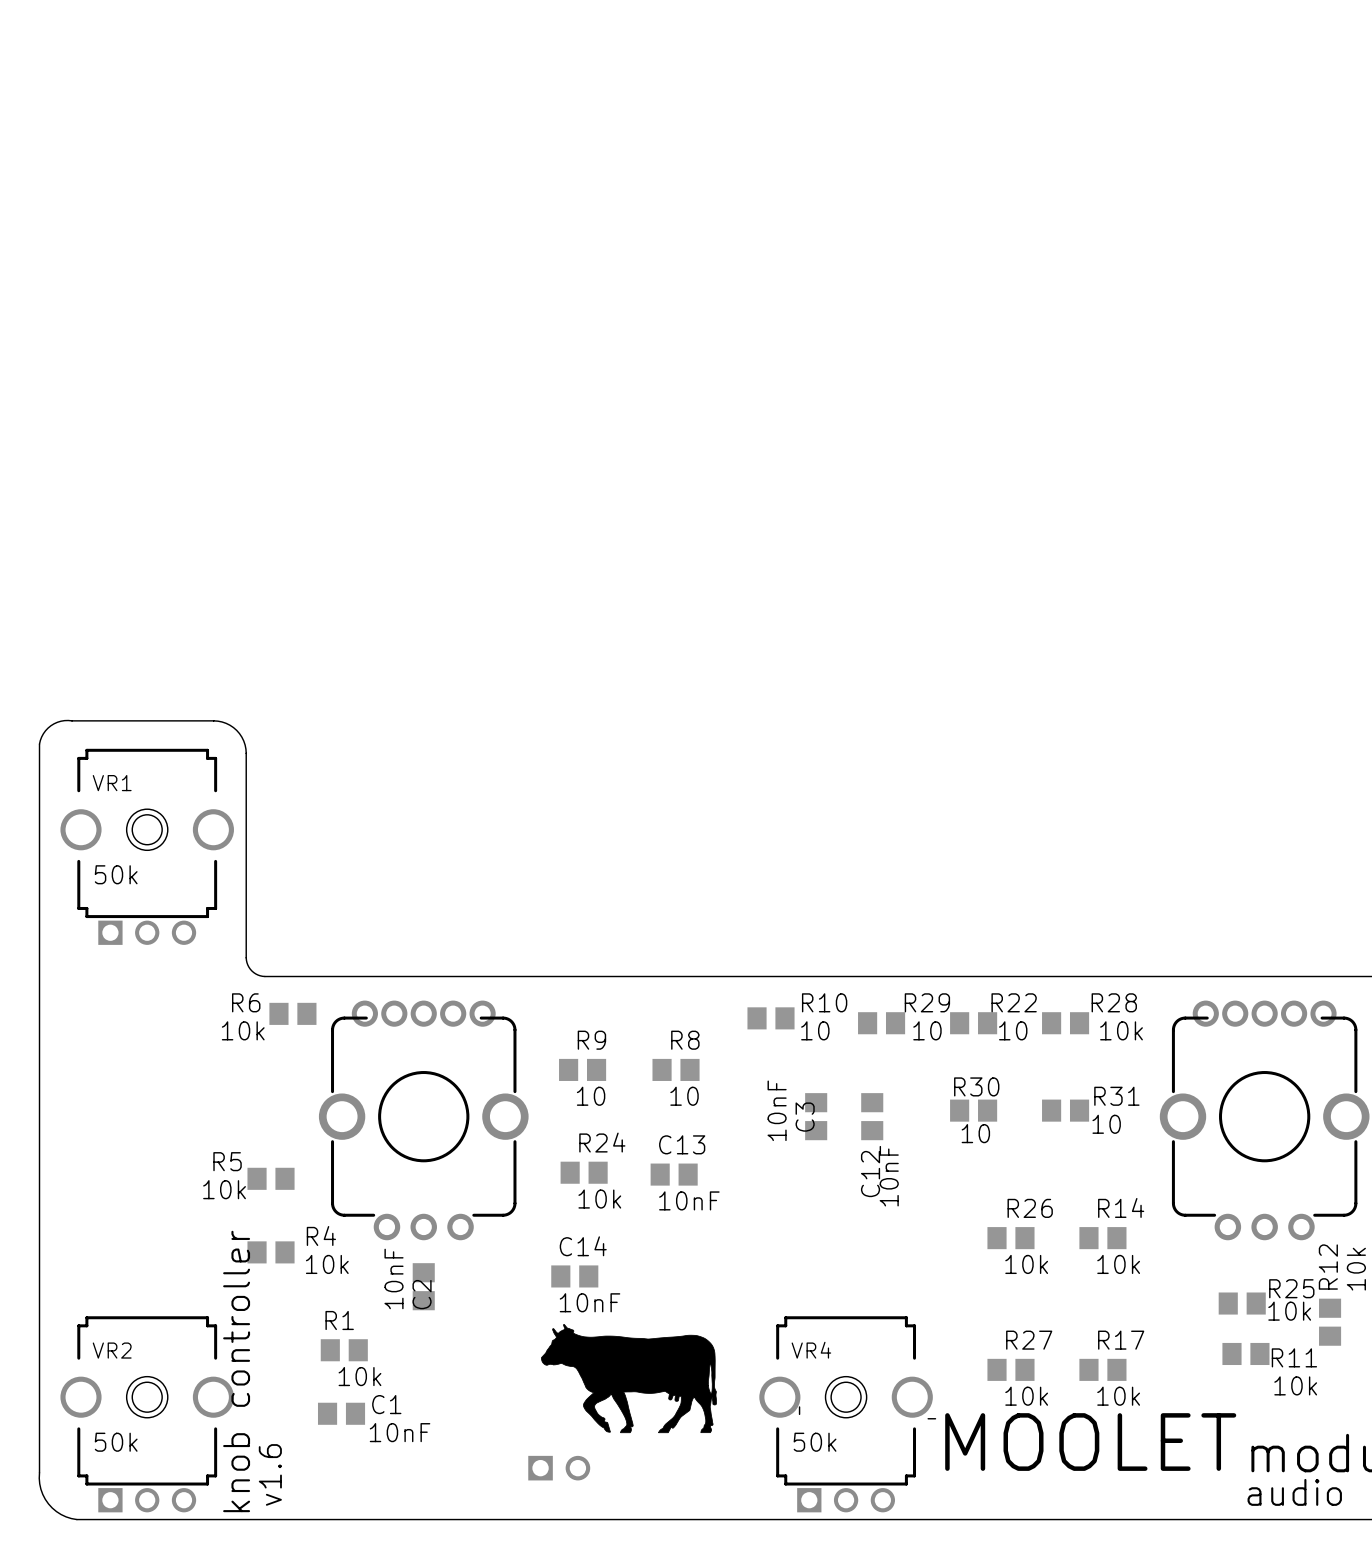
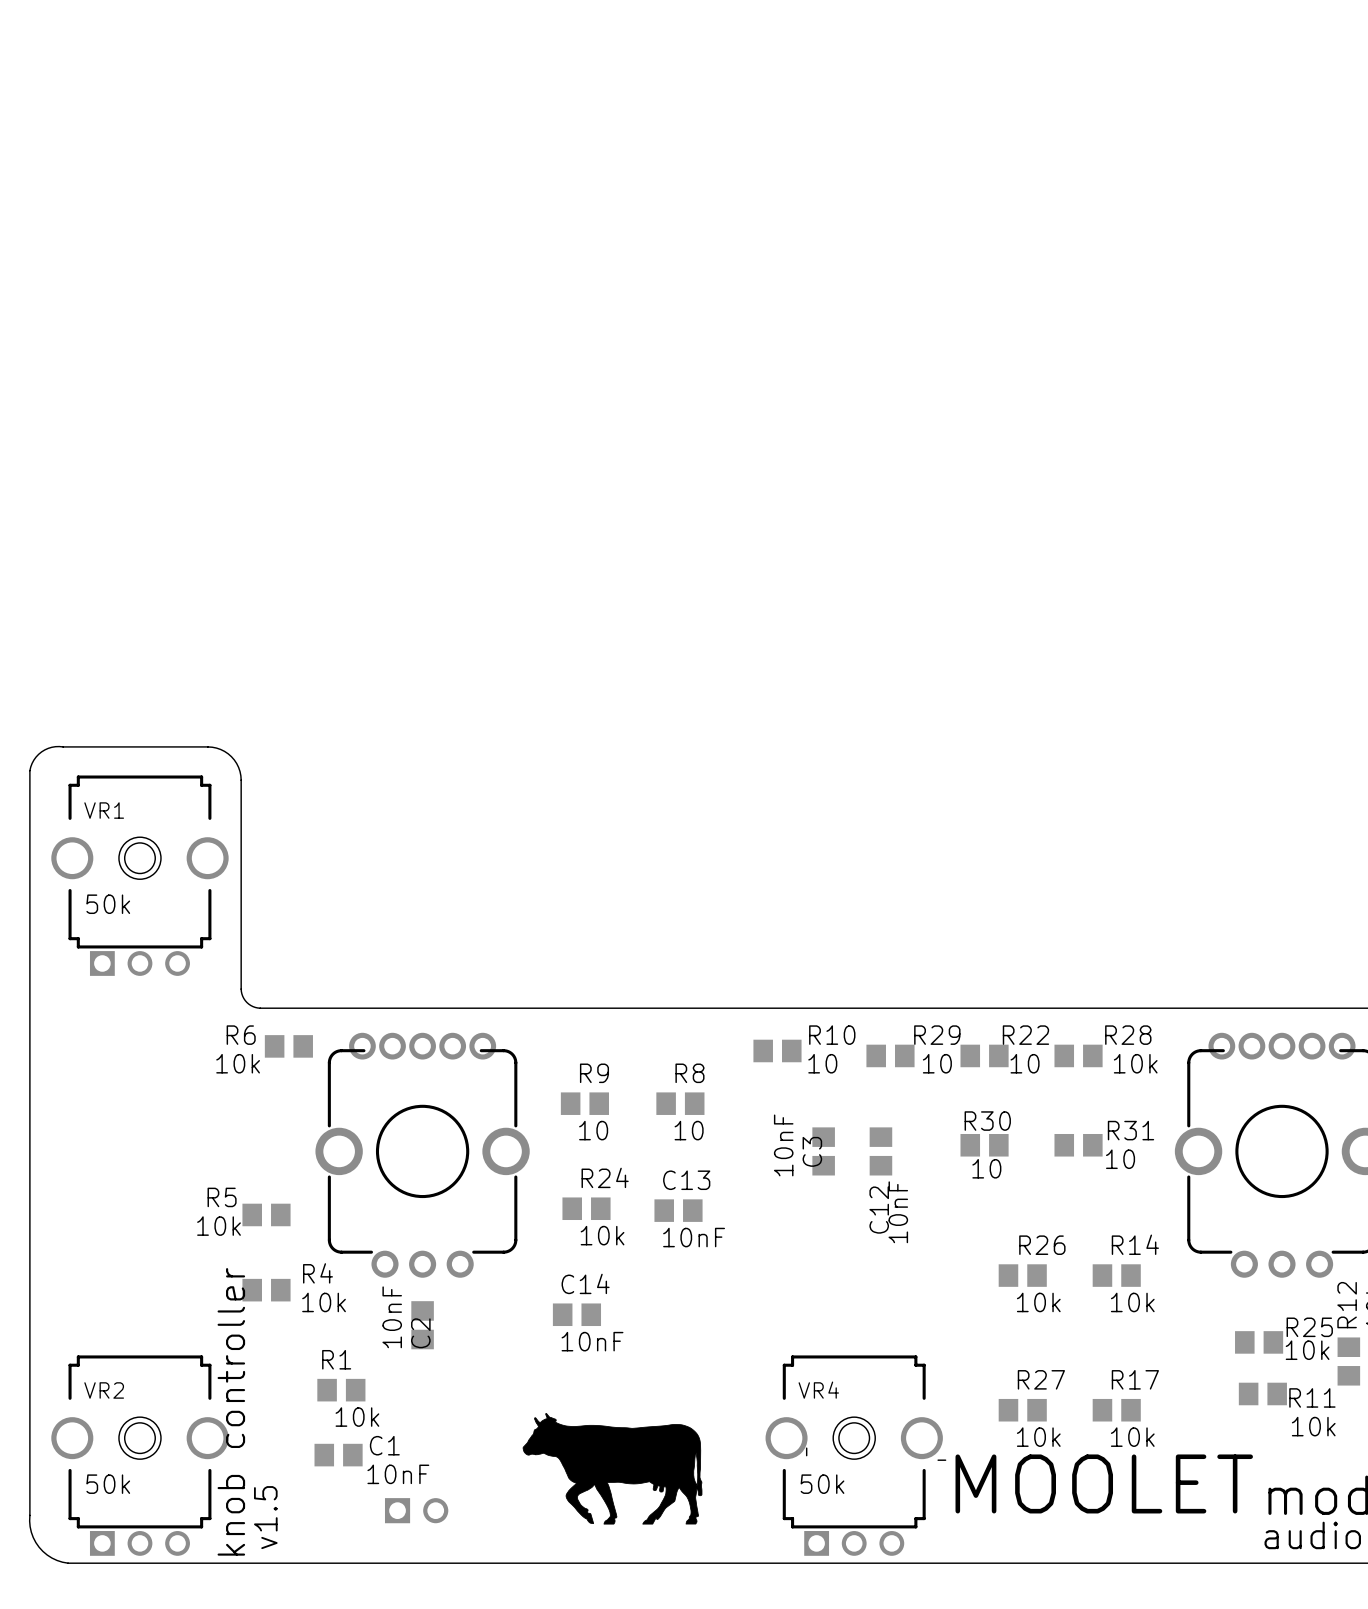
drawing position: (628, 1378) -> (612, 1468)
part position: (559, 1468) -> (416, 1510)
text: v1.6 (270, 1474) -> v1.5 (265, 1517)

